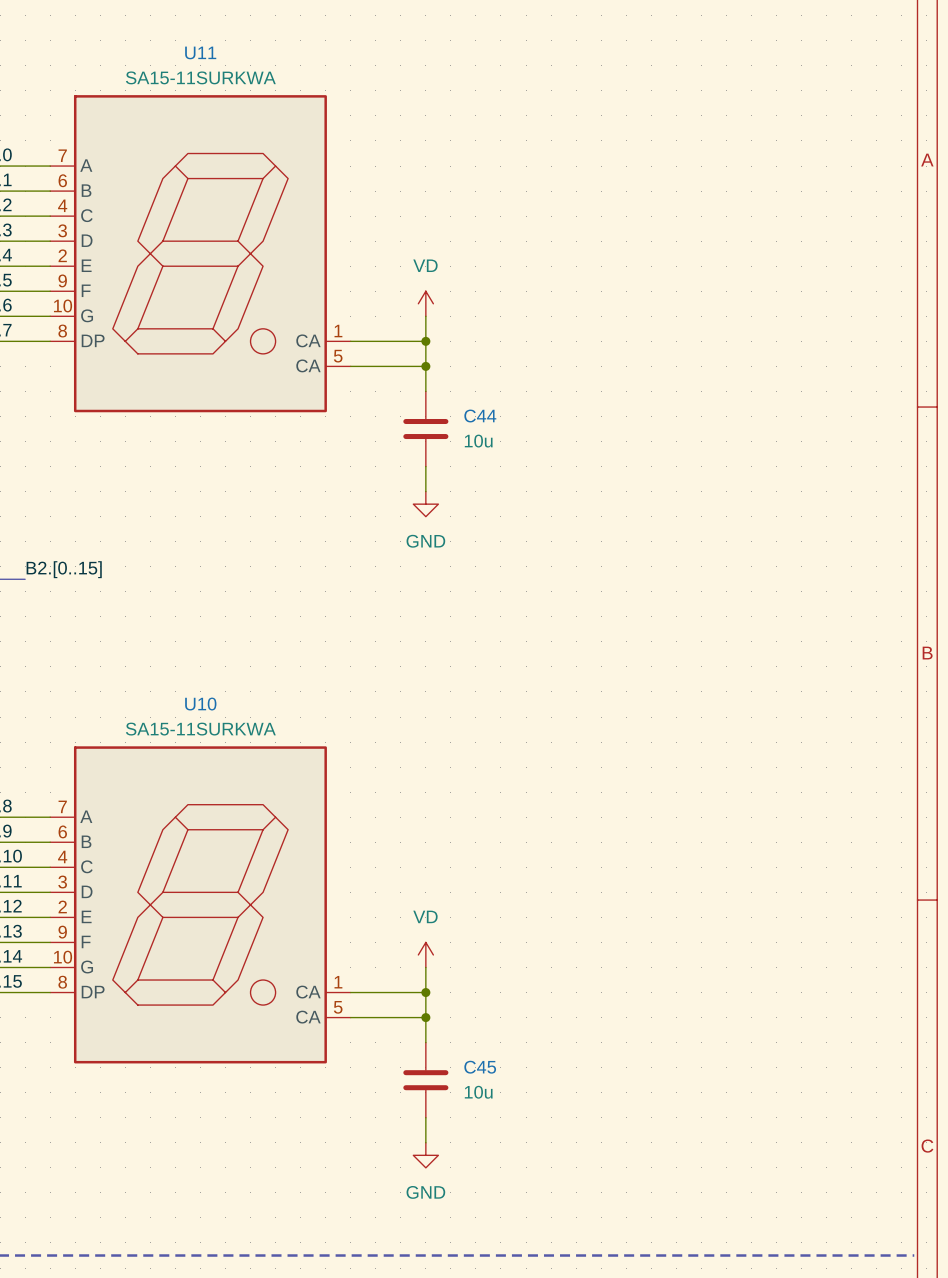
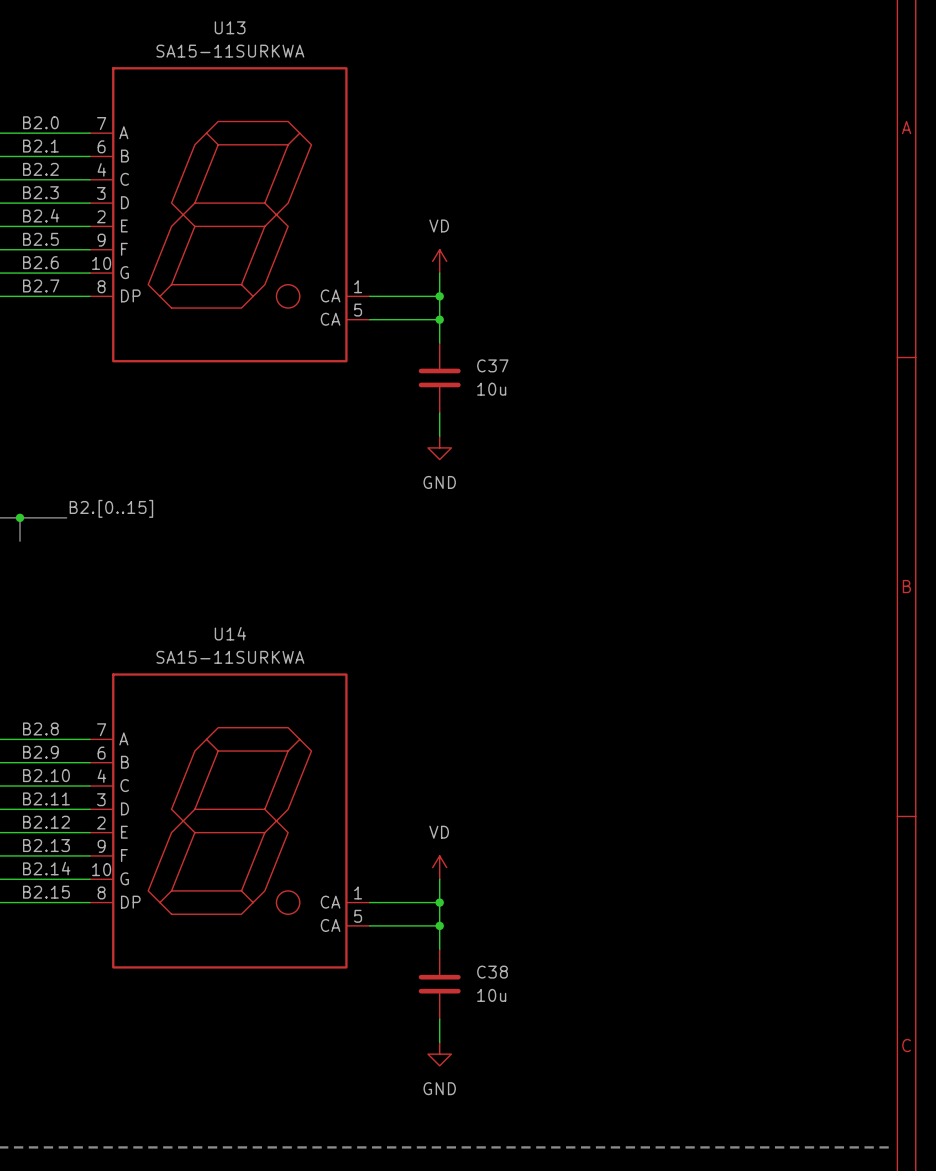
U11 name: U11 (200, 52) -> U13 (230, 27)
C44 name: C44 (480, 416) -> C37 (492, 365)
U10 name: U10 (200, 704) -> U14 (230, 633)
C45 name: C45 (480, 1067) -> C38 (492, 972)

